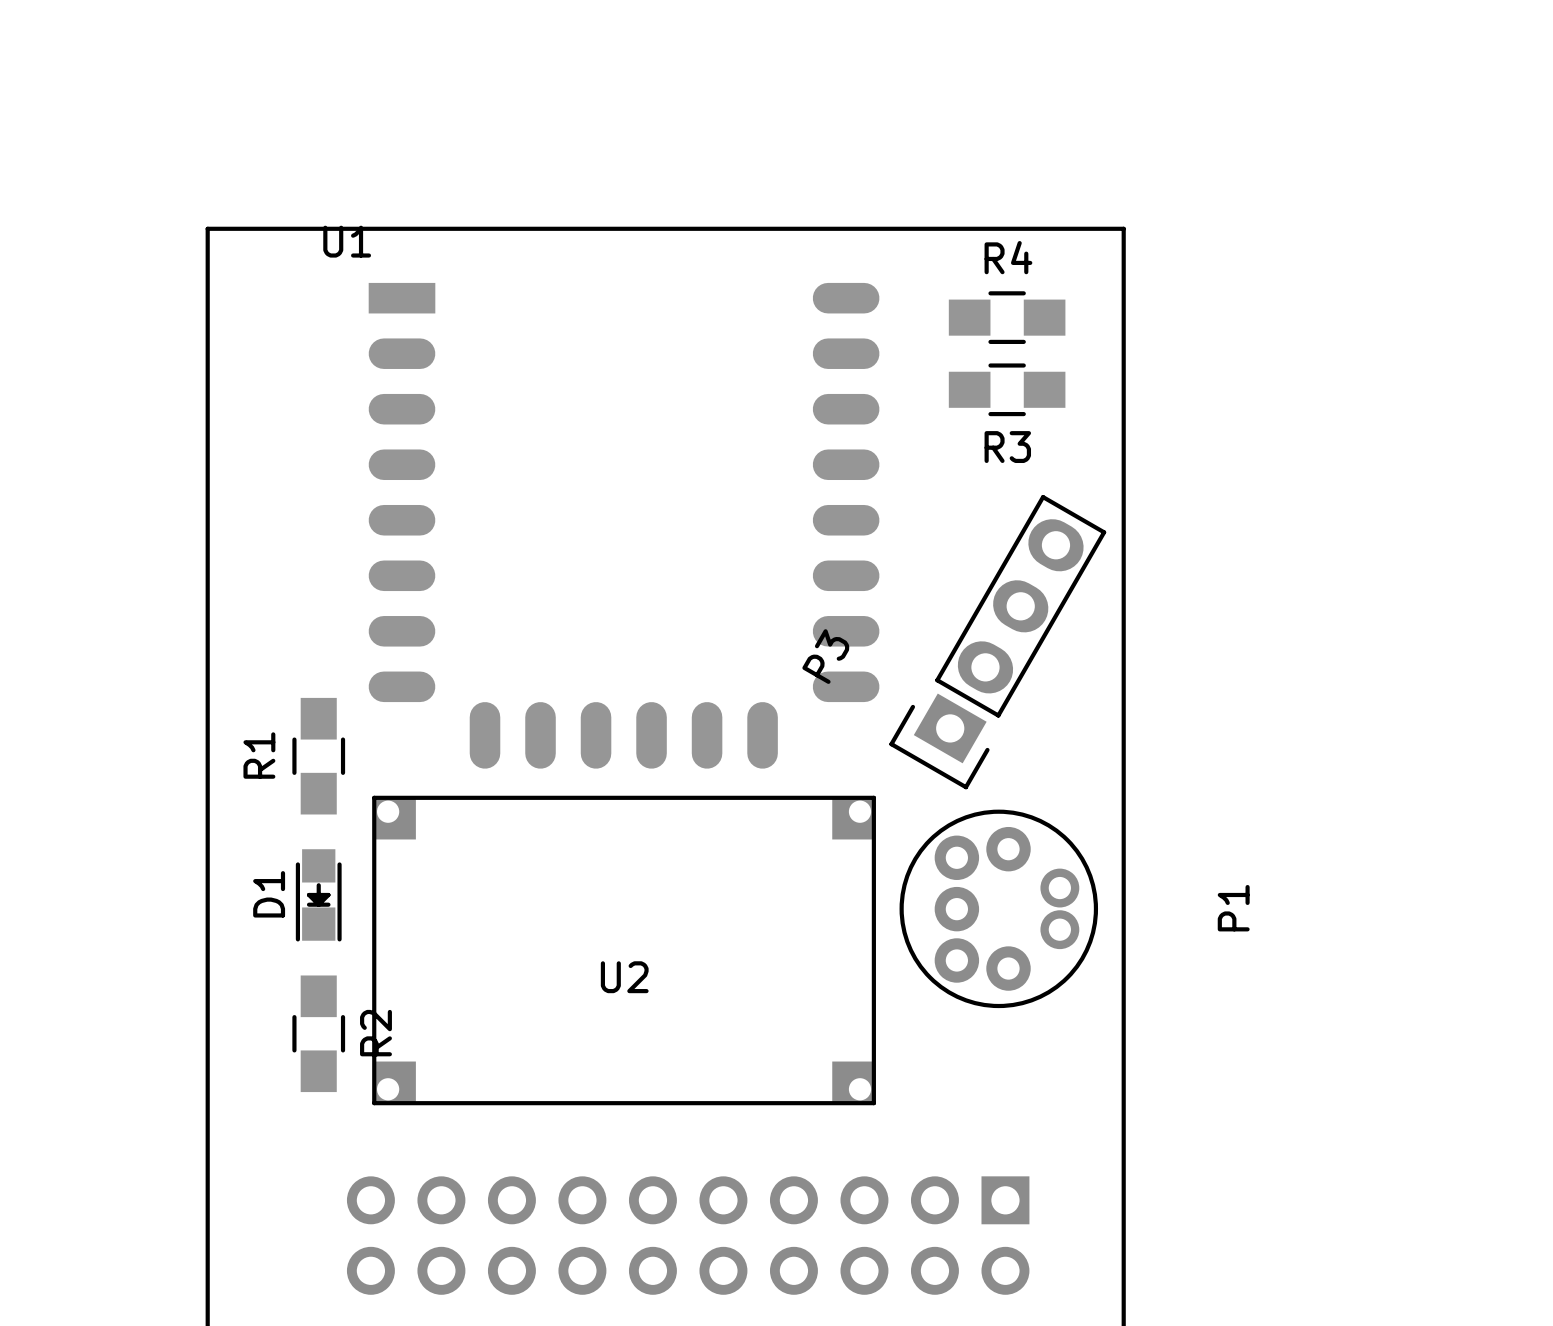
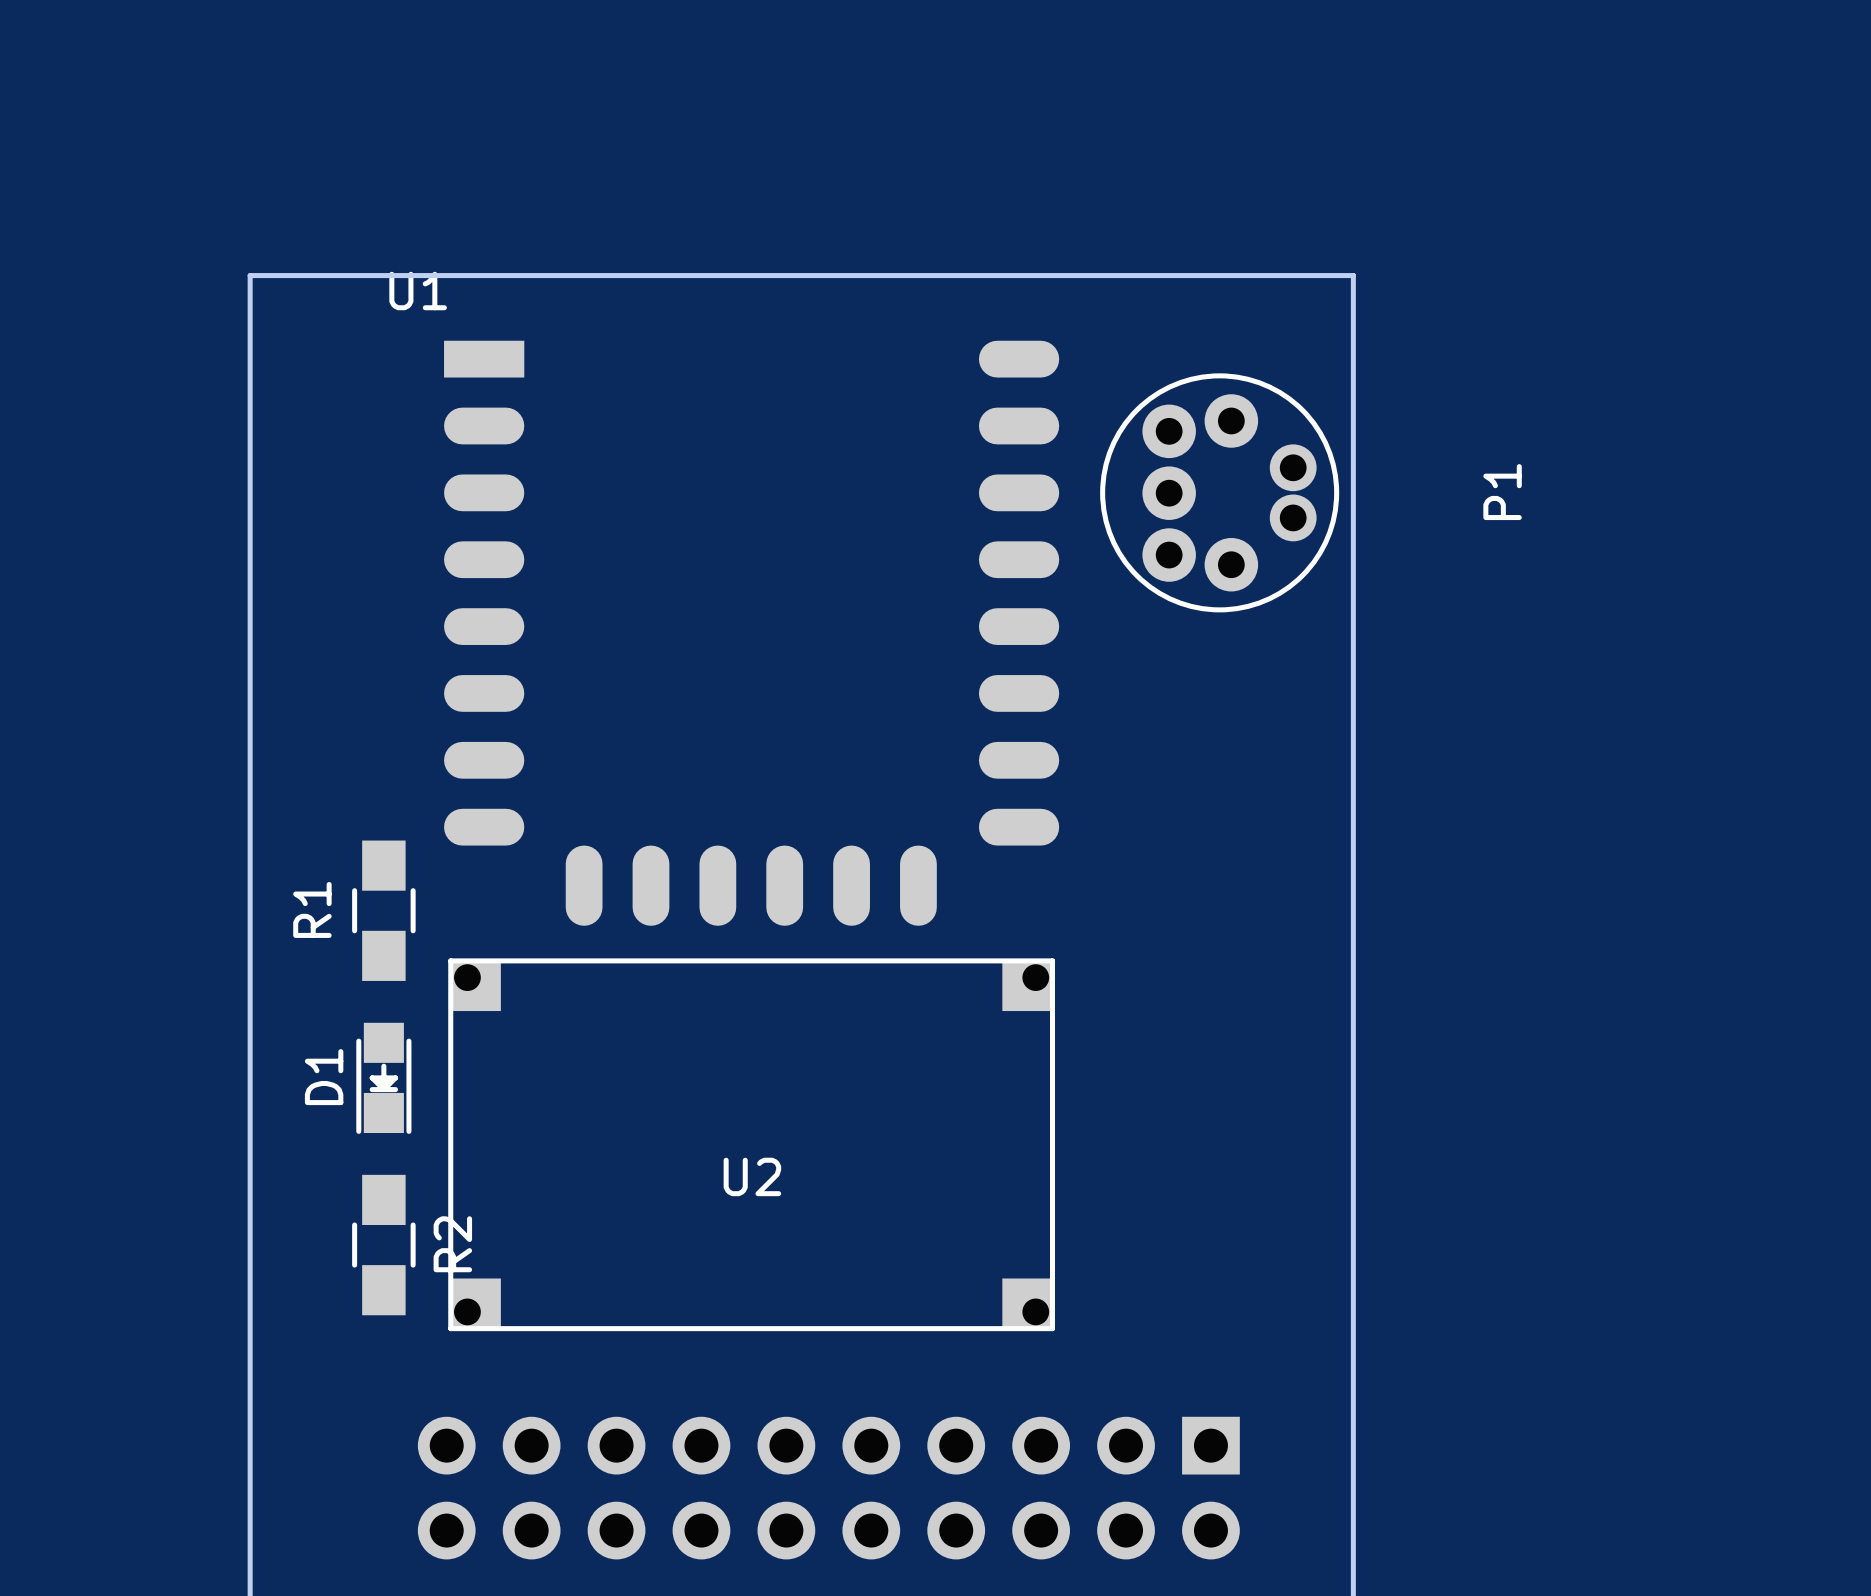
R4: (1007, 317) -> none
R3: (1007, 389) -> none
P3: (997, 642) -> none
P1 position: (998, 908) -> (1219, 492)

